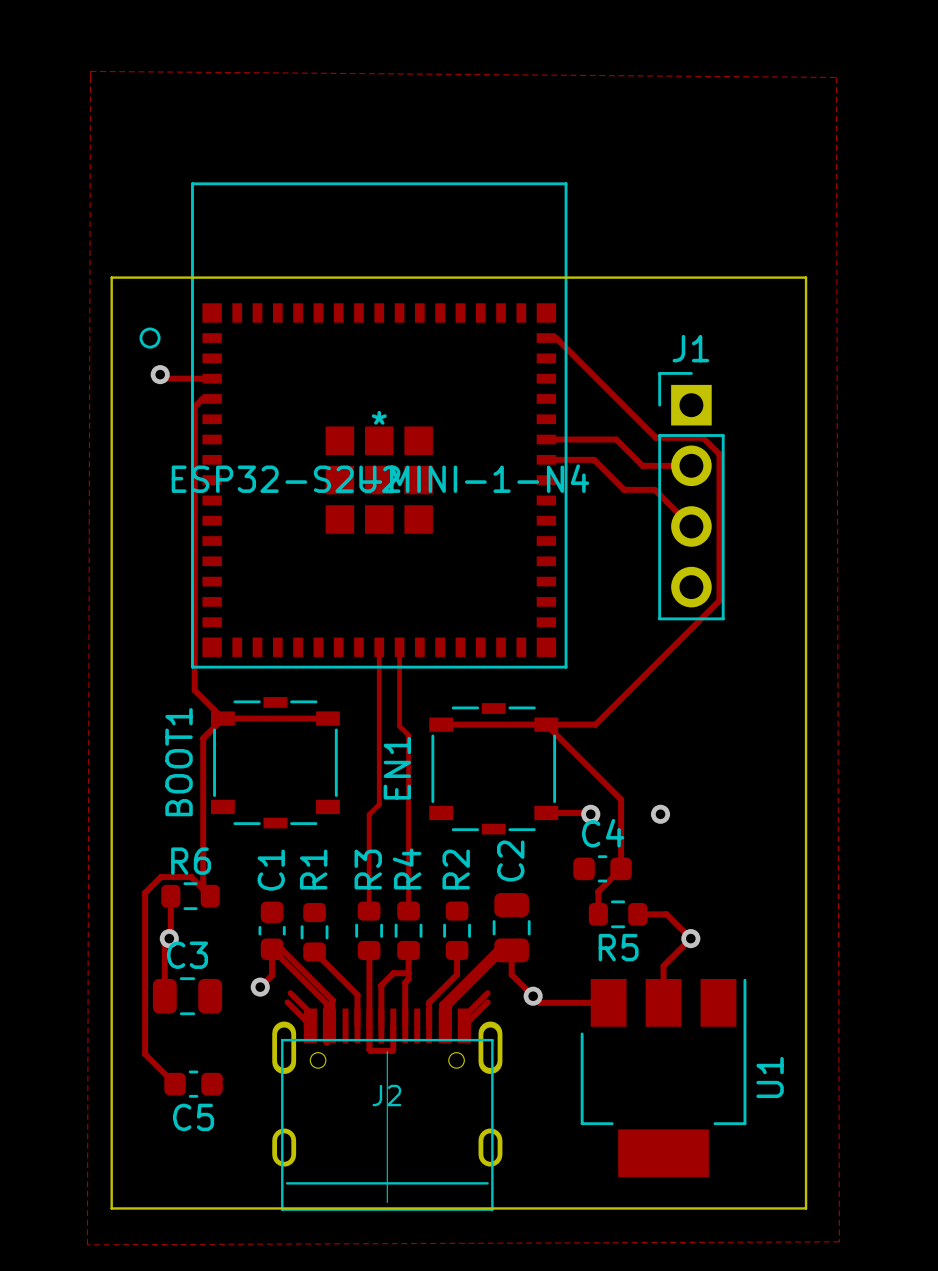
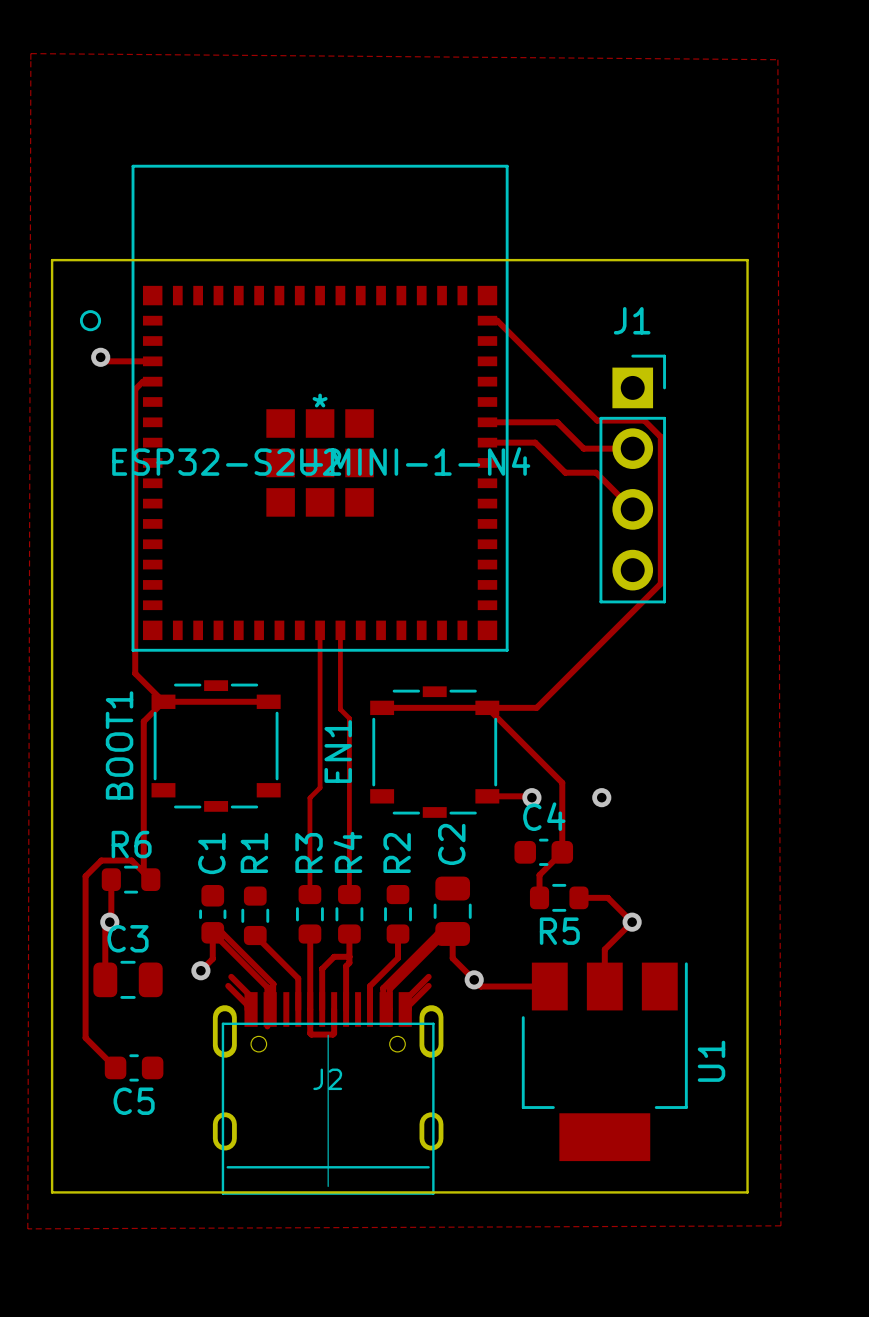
J1 footprint: [658, 371, 725, 621] -> [599, 354, 666, 604]

